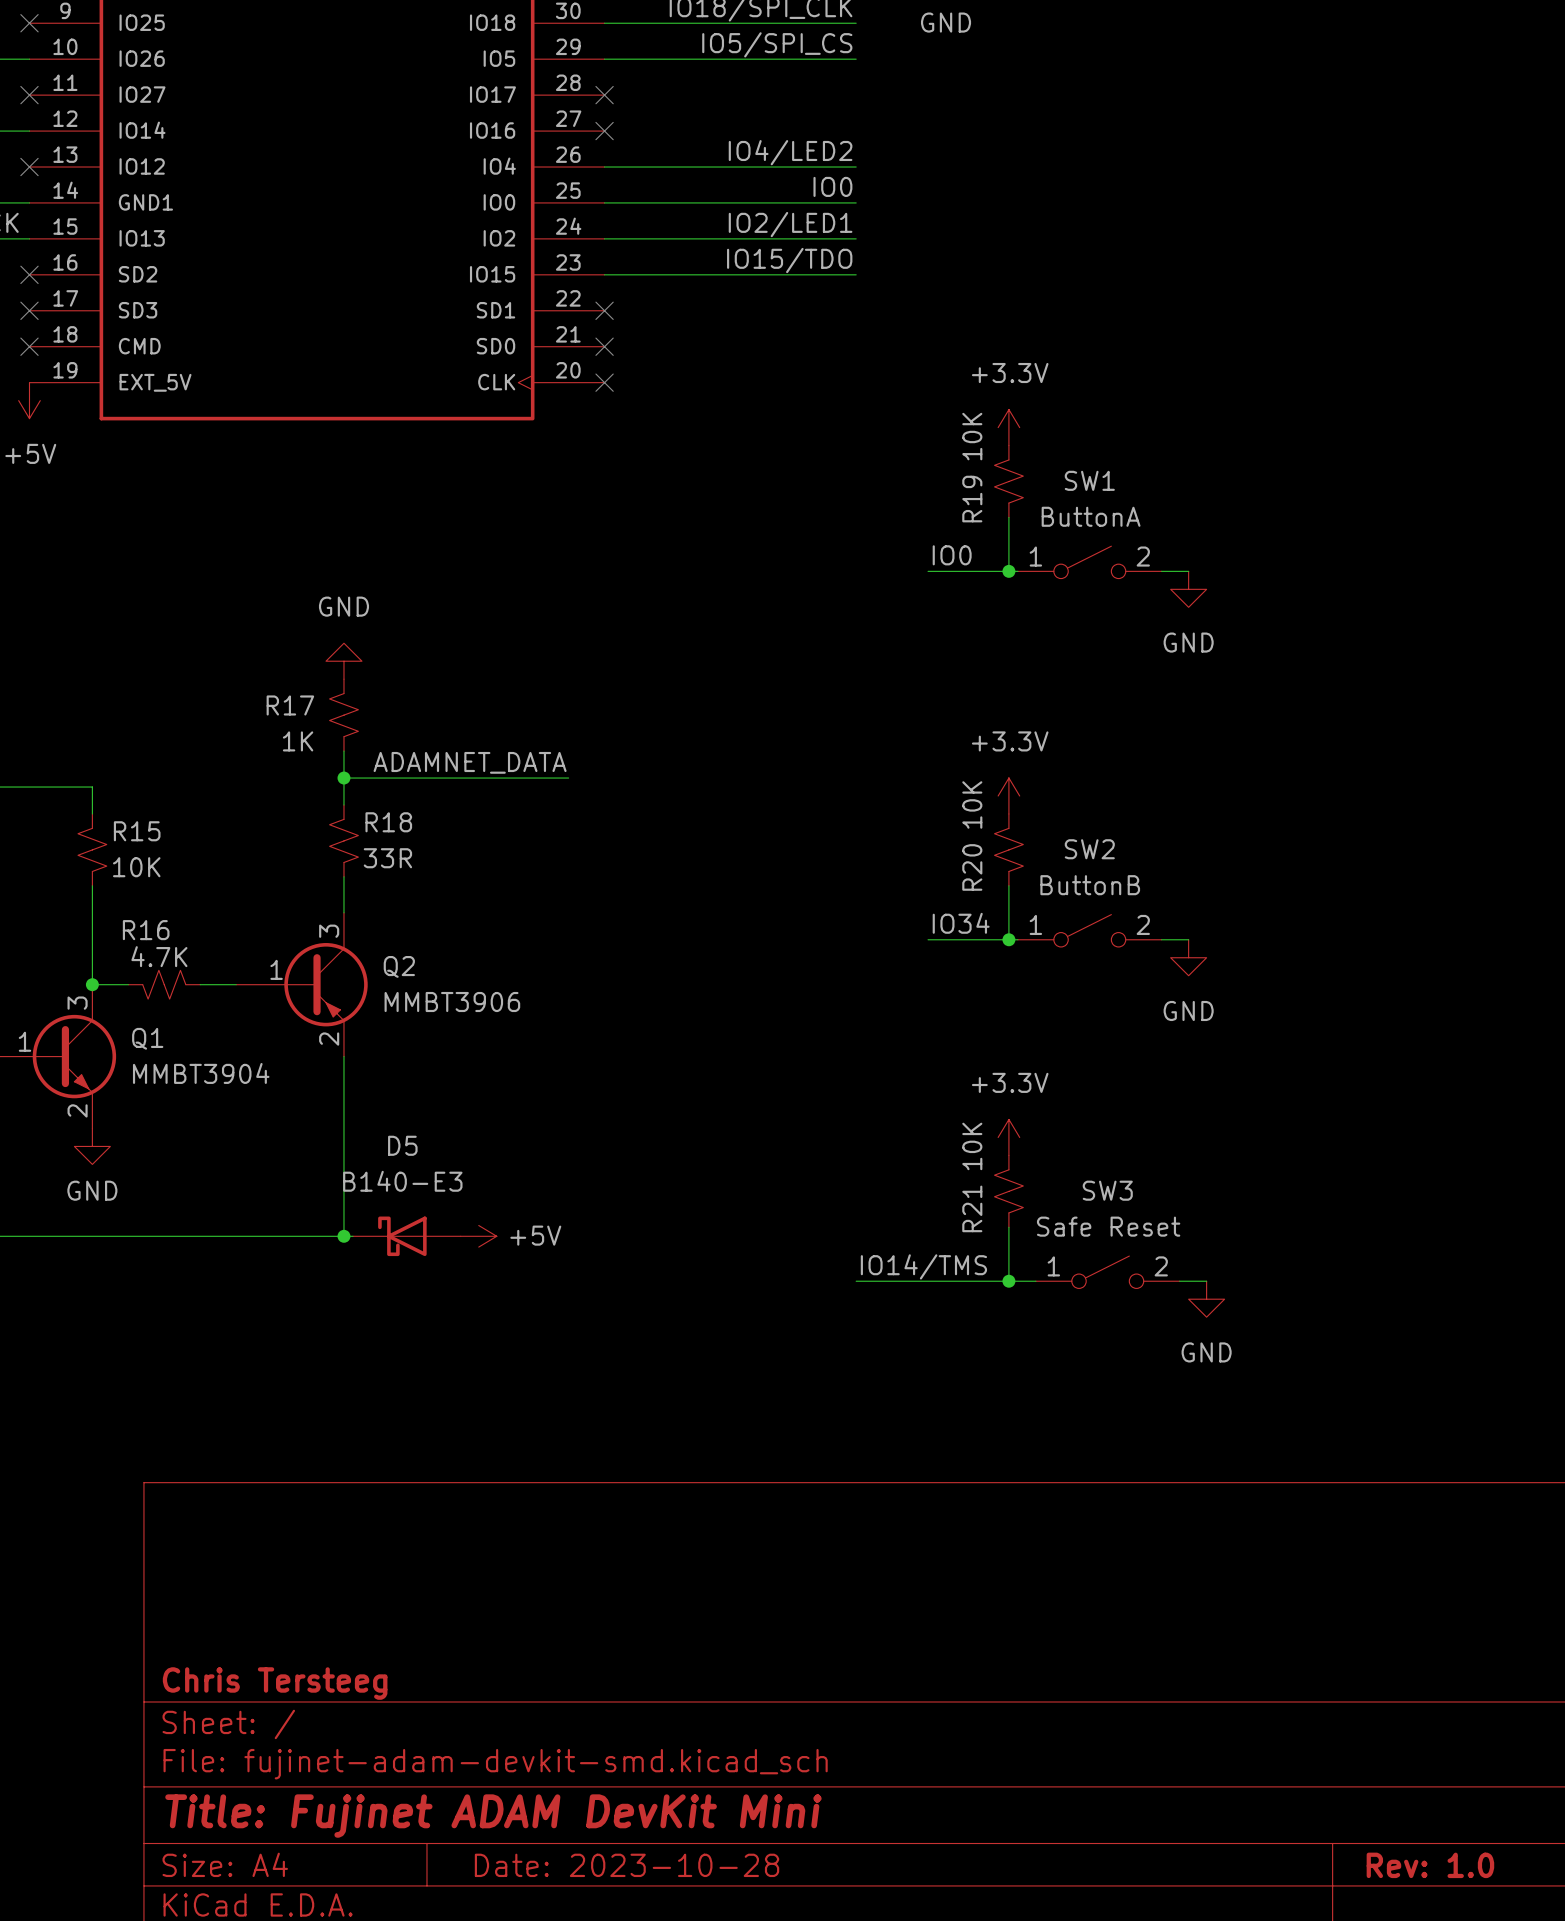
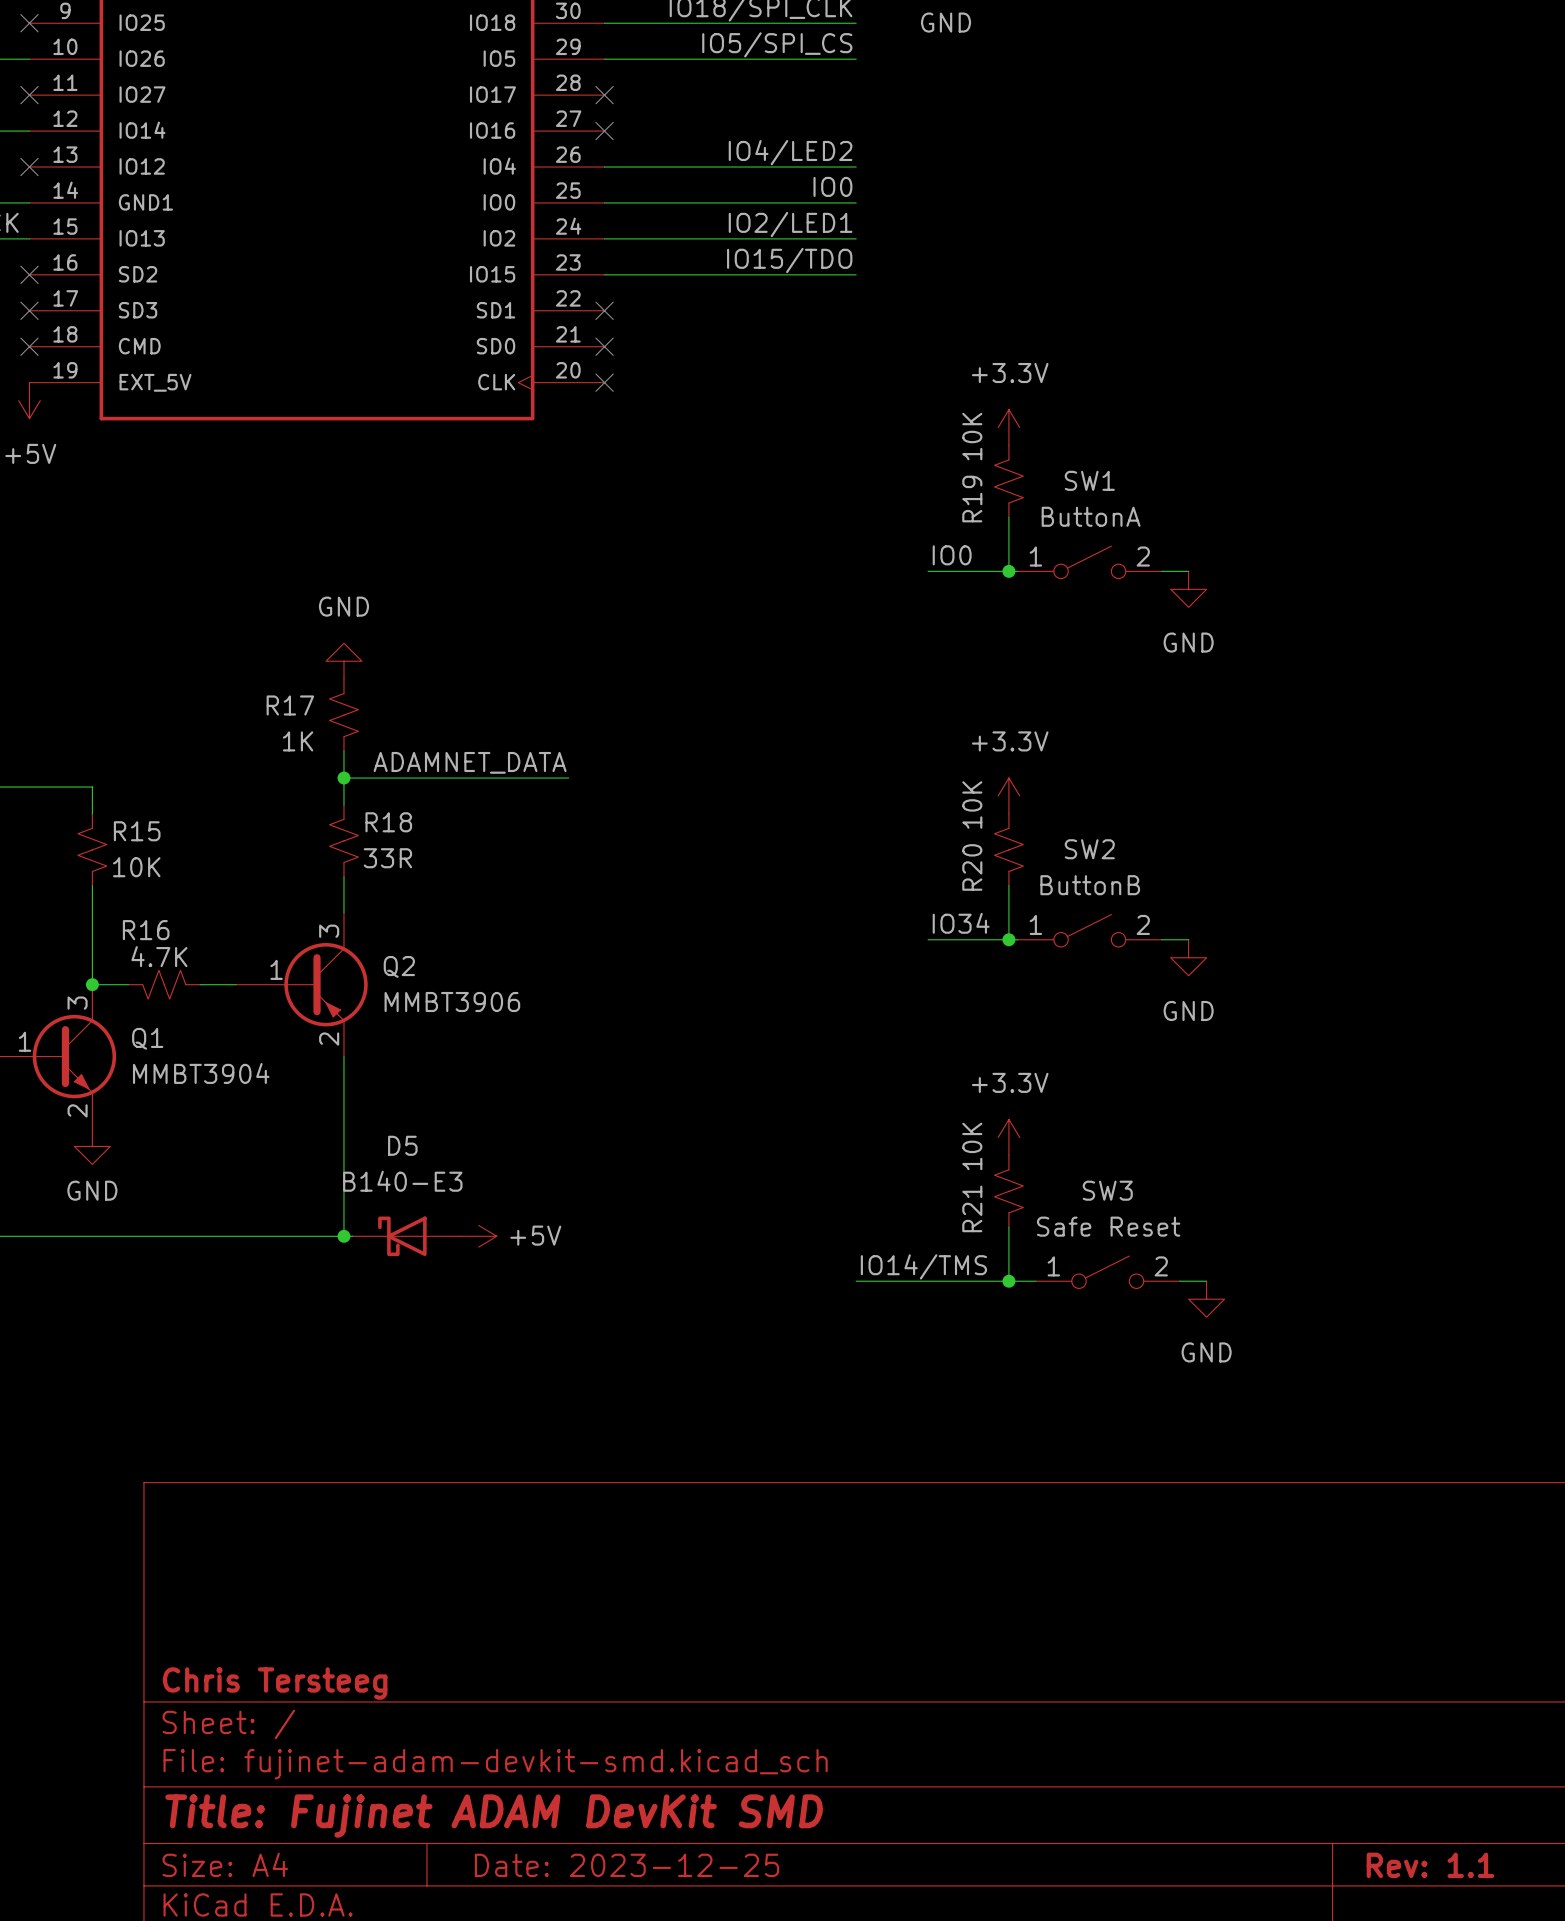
title block: Title: Fujinet ADAM DevKit Mini (493, 1816) -> Title: Fujinet ADAM DevKit SMD (494, 1816)
title block: Date: 2023-10-28 (627, 1865) -> Date: 2023-12-25 (627, 1865)
title block: Rev: 1.0 (1430, 1865) -> Rev: 1.1 (1430, 1865)

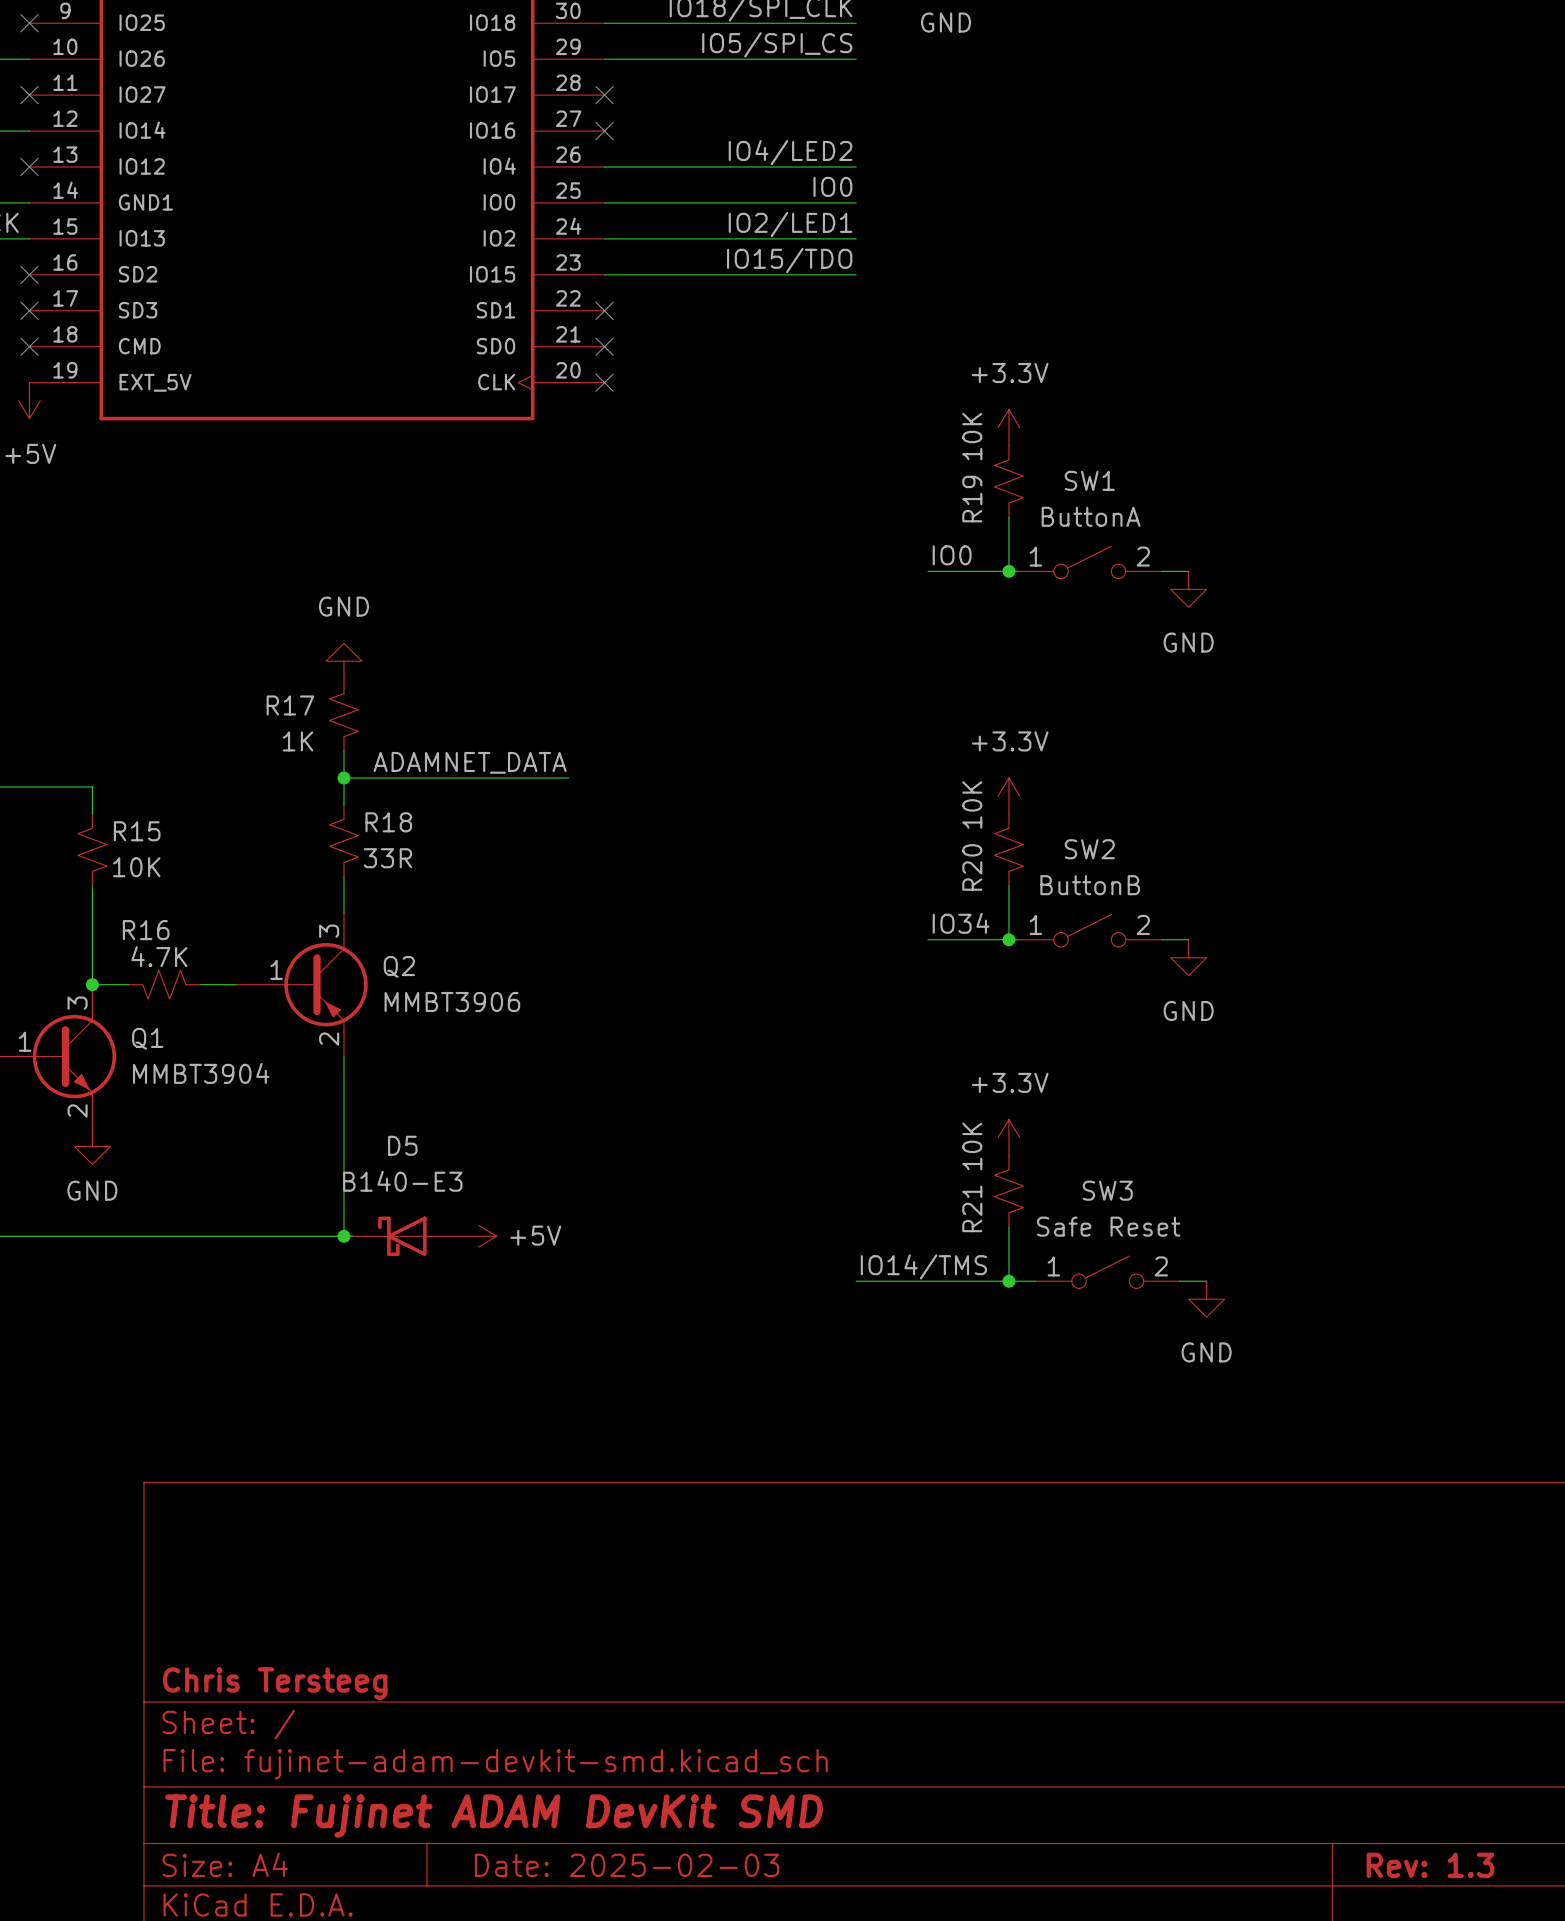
title block: Date: 2023-12-25 (627, 1865) -> Date: 2025-02-03 (627, 1865)
title block: Rev: 1.1 (1430, 1865) -> Rev: 1.3 (1430, 1865)

